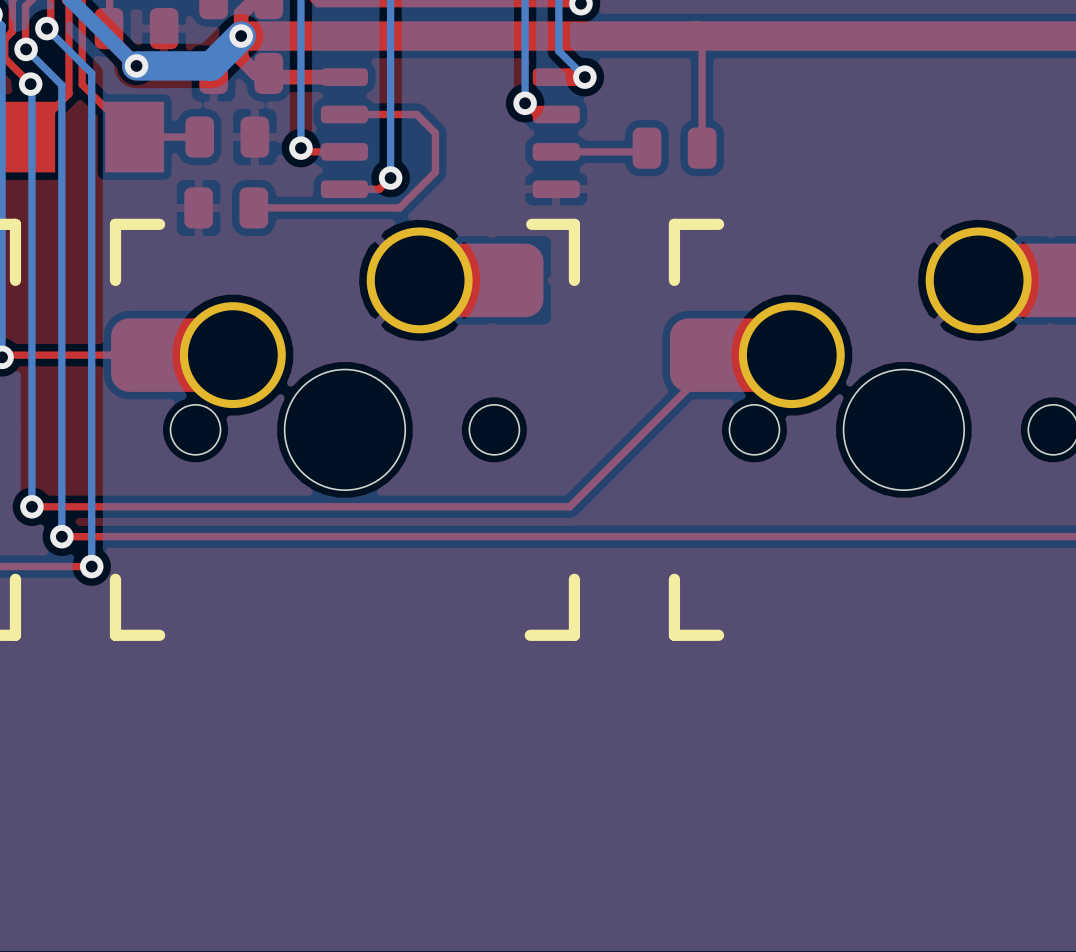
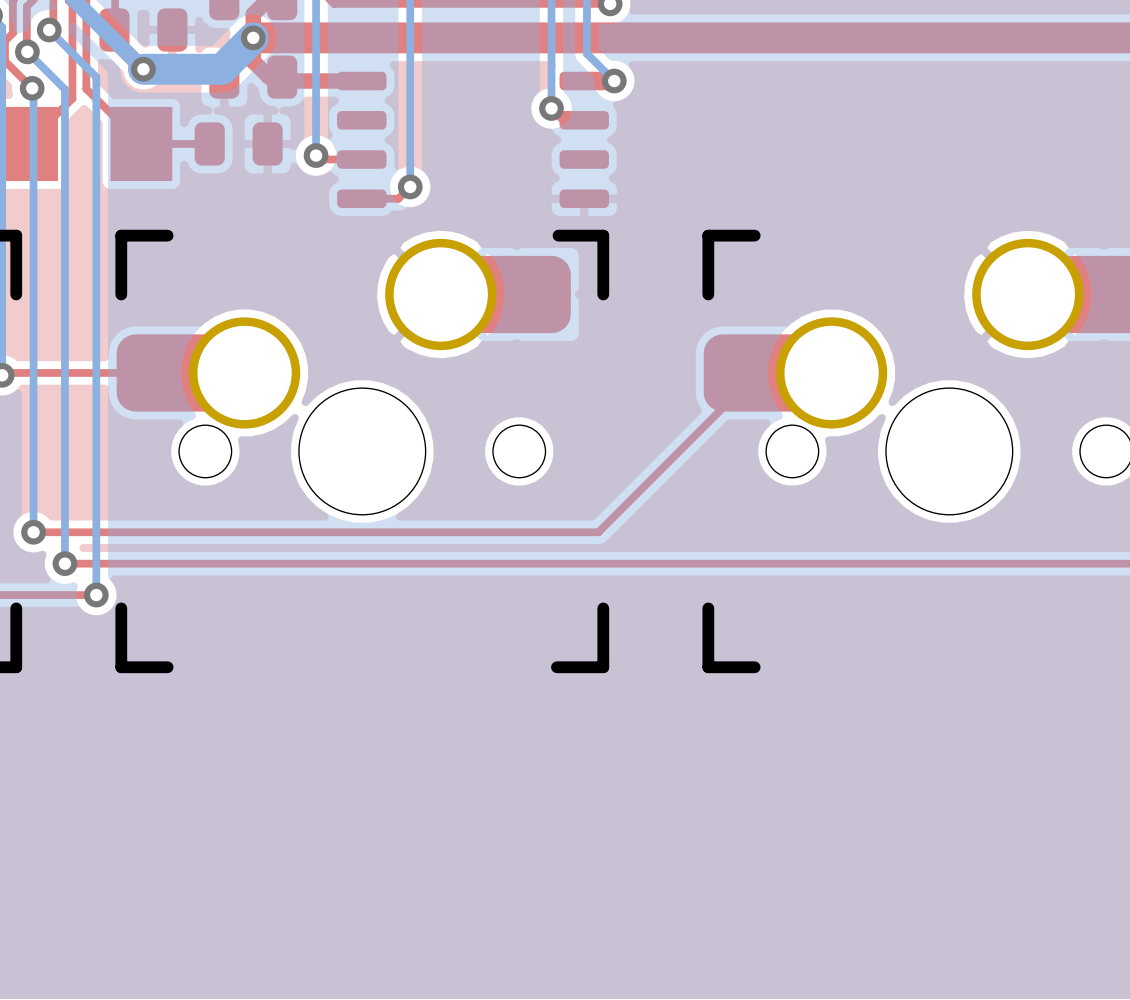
top track: (696, 36) (702, 41) (702, 148) -> none
top track: (344, 114) (416, 114) (435, 133) (435, 172) (399, 207) (253, 207) -> none
top track: (646, 148) (643, 151) (556, 151) -> none
part: (674, 148) -> none
part: (226, 207) -> none

